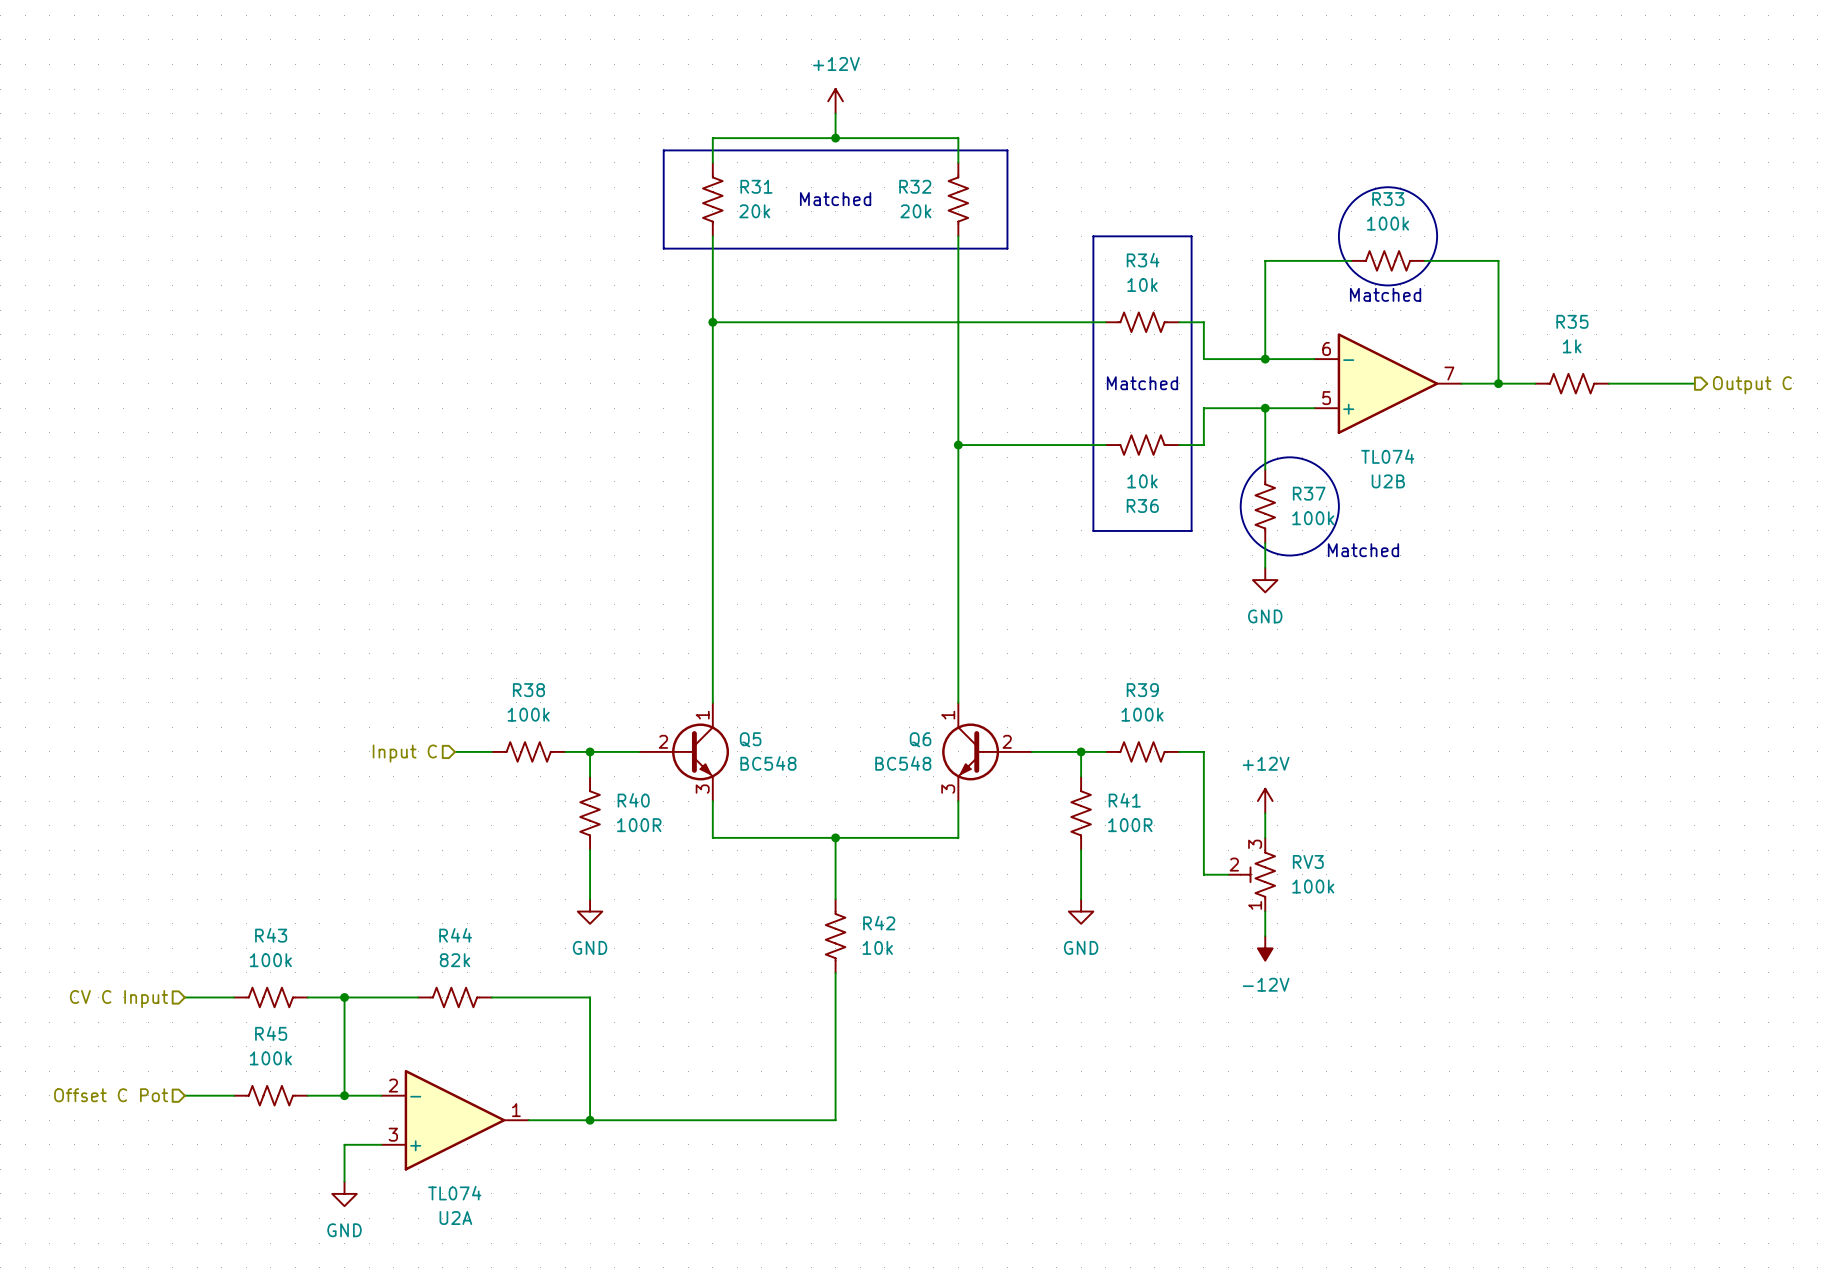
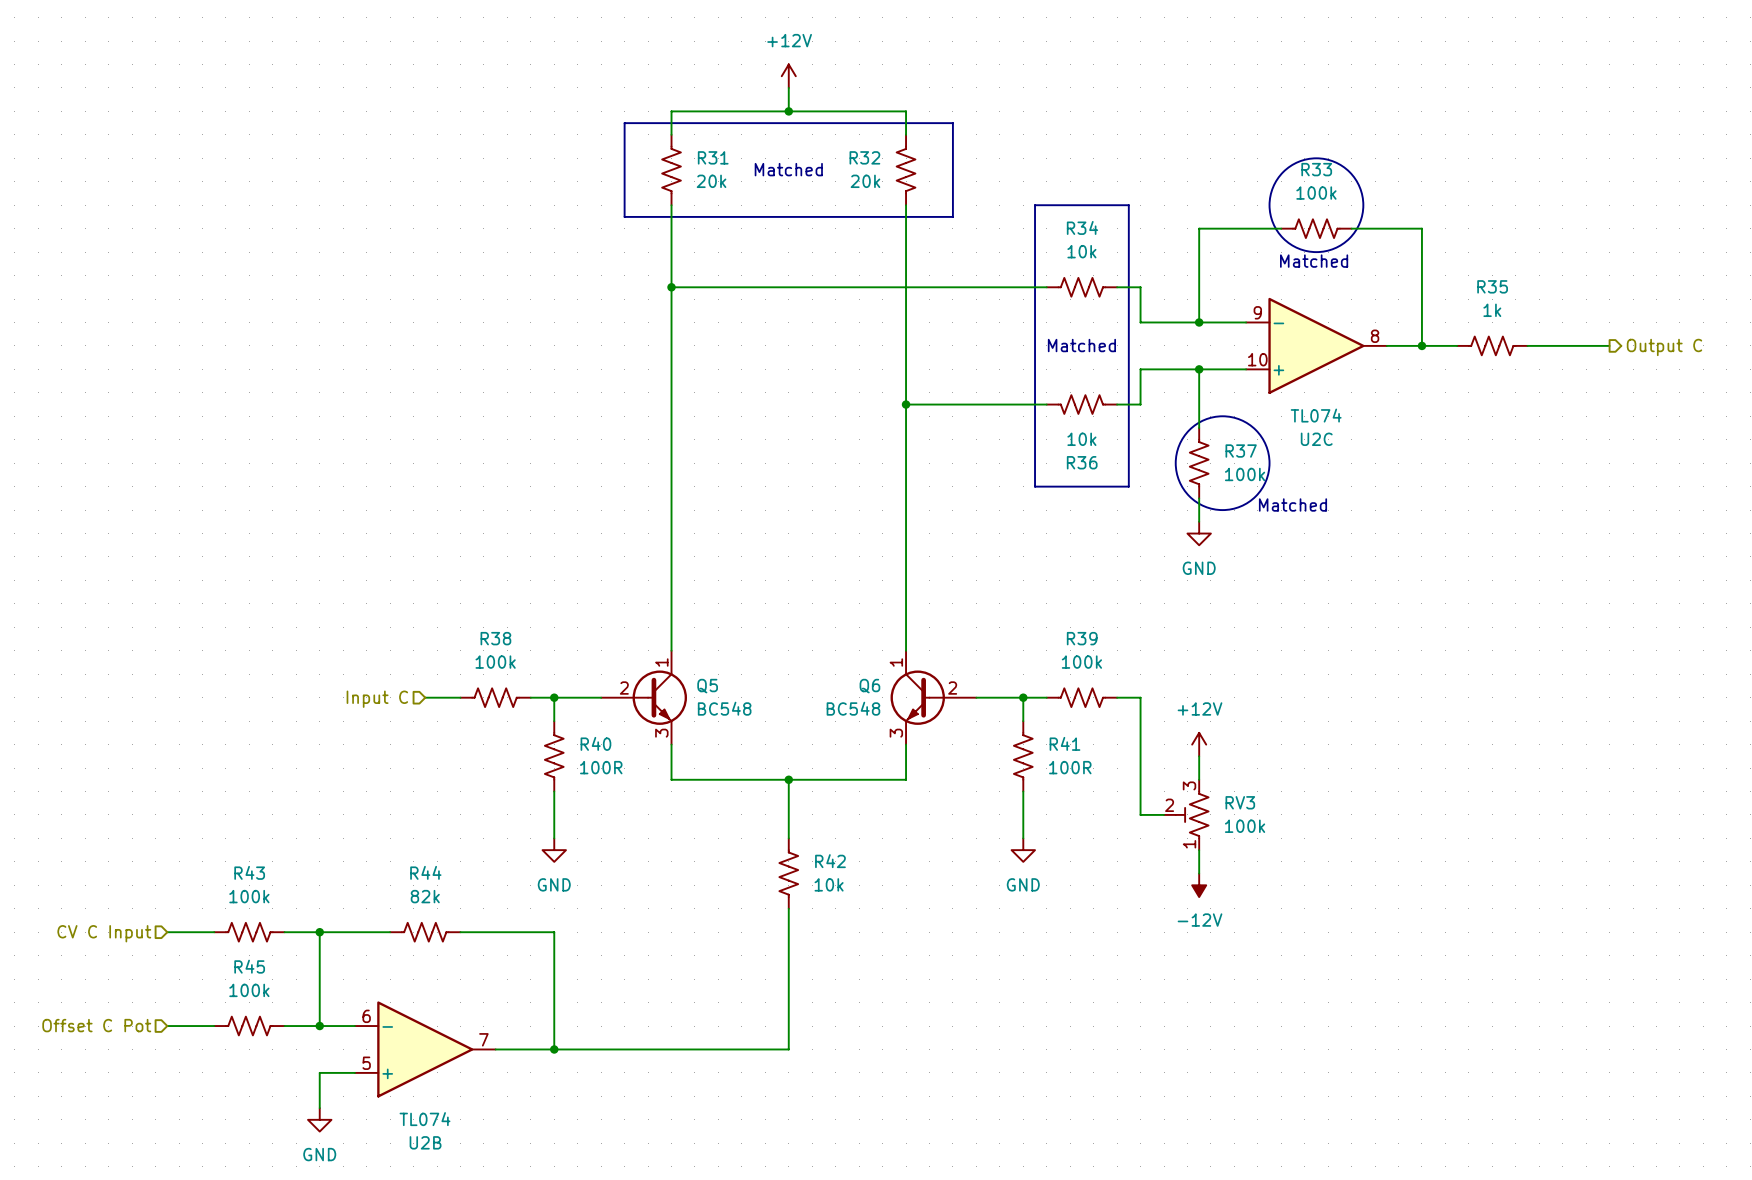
U2B position: (1388, 383) -> (425, 1049)
U2C: none -> TL074 (1316, 345)
U2A: TL074 (455, 1120) -> none

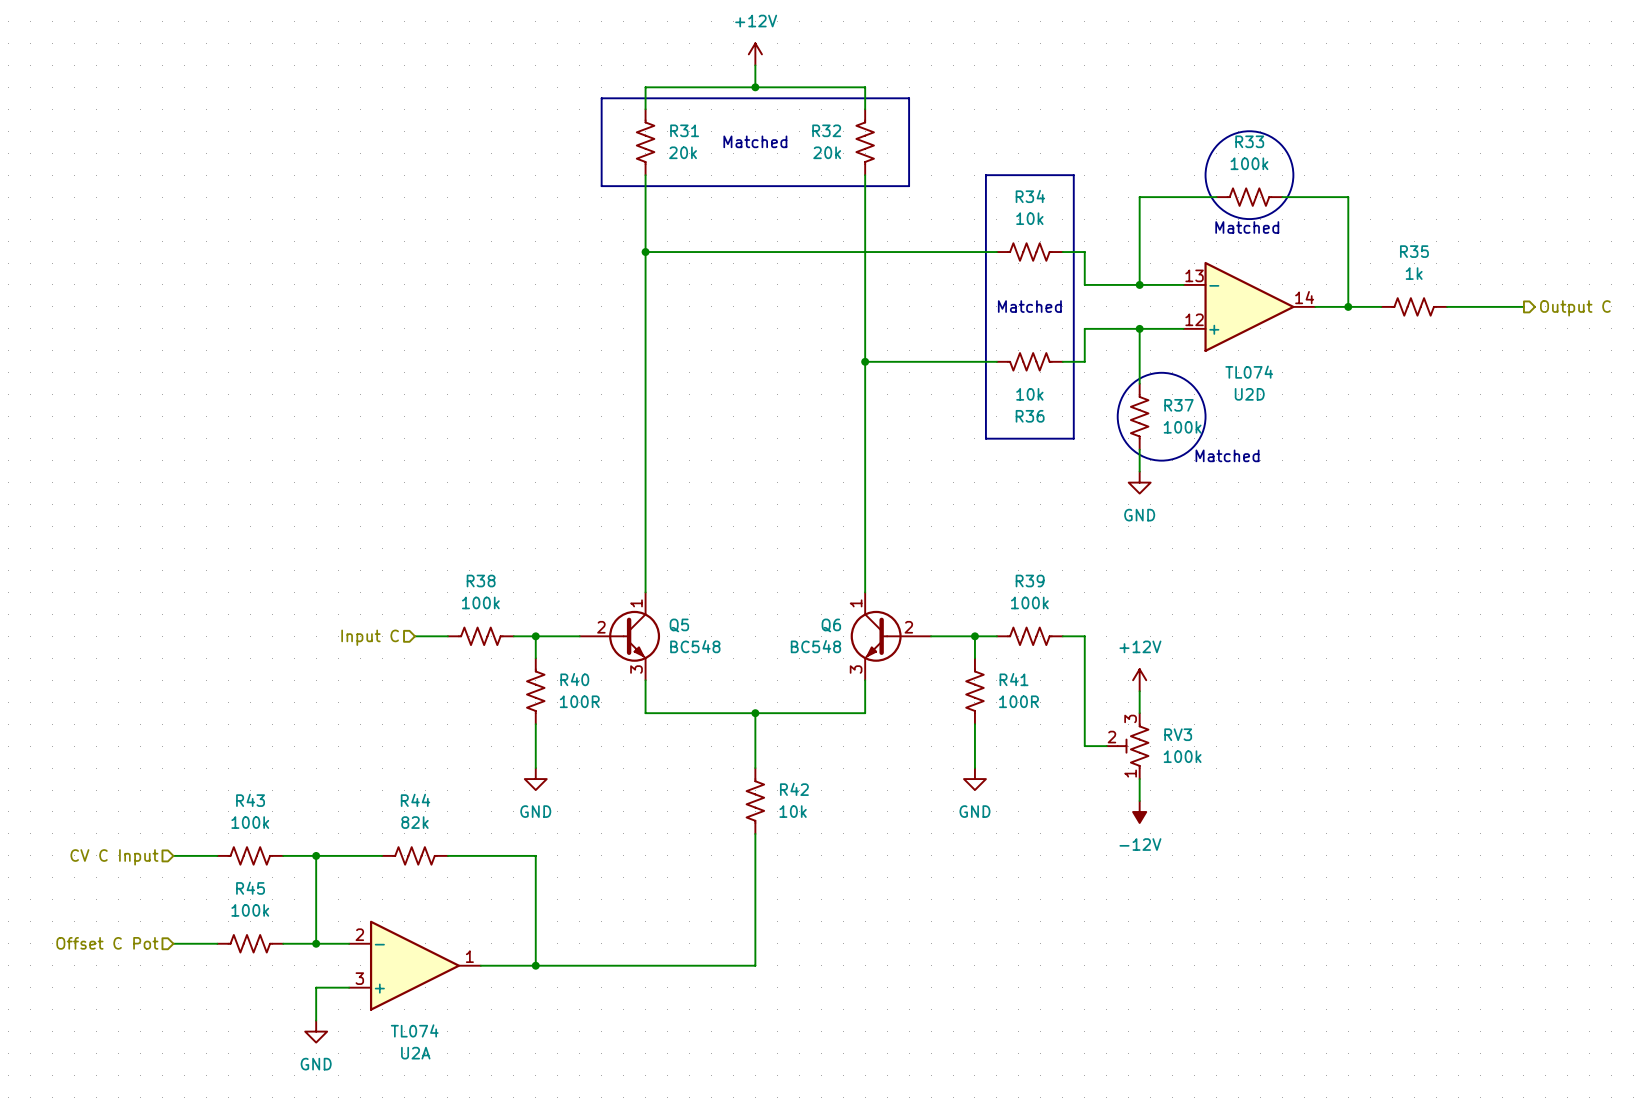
U2C pin number: 9 (1257, 312) -> 13 (1194, 275)
U2C pin number: 8 (1375, 336) -> 14 (1304, 297)
U2C pin number: 10 (1257, 359) -> 12 (1194, 319)
U2C name: U2C (1316, 439) -> U2D (1249, 394)
U2B pin number: 6 (366, 1016) -> 2 (359, 934)
U2B pin number: 7 (483, 1039) -> 1 (469, 956)
U2B pin number: 5 (366, 1063) -> 3 (359, 978)
U2B name: U2B (425, 1142) -> U2A (415, 1053)

